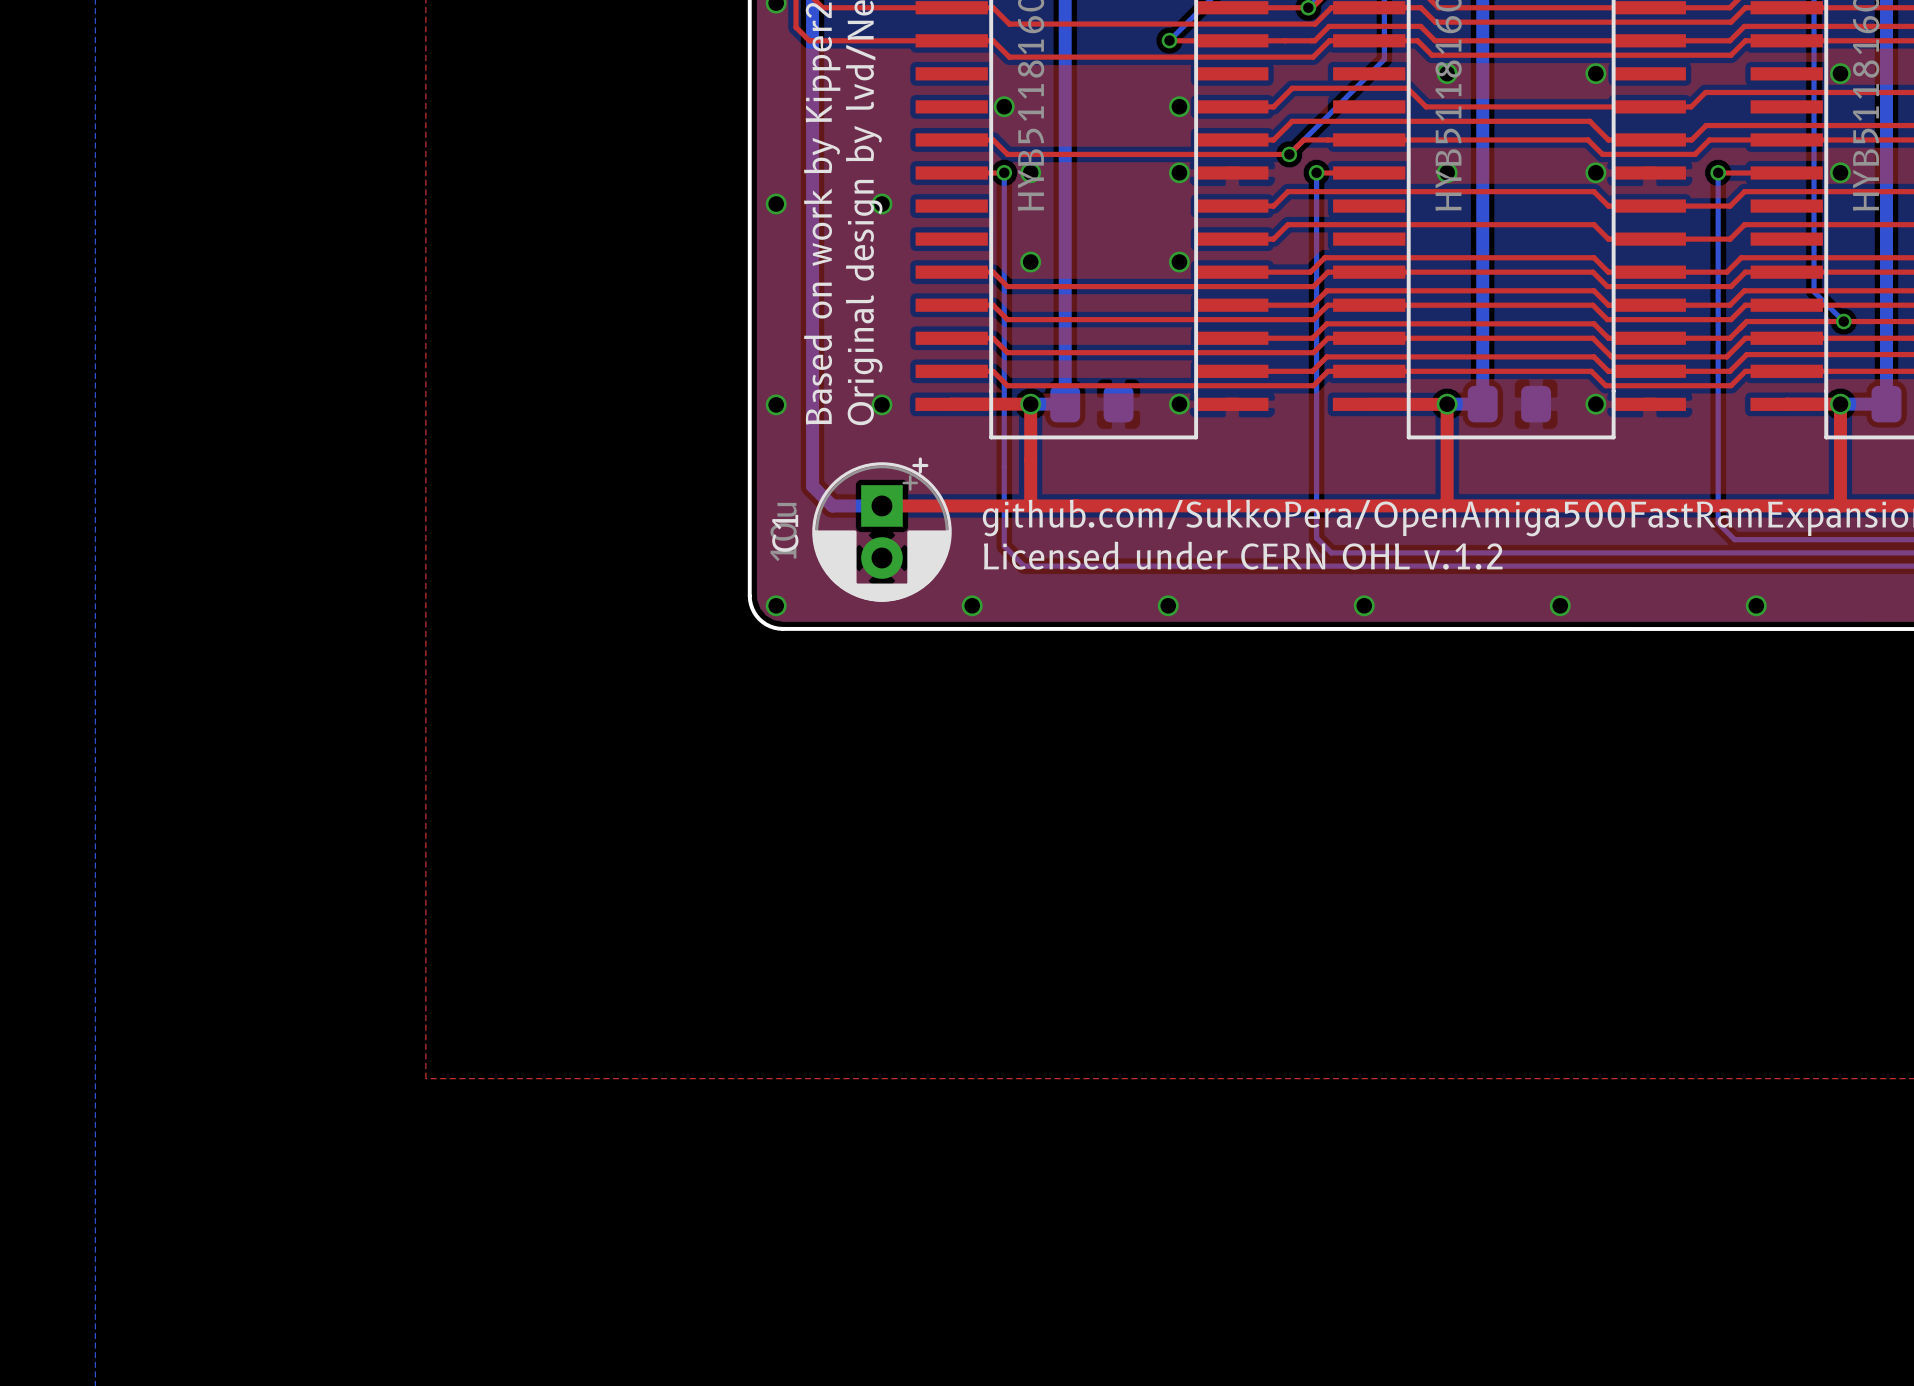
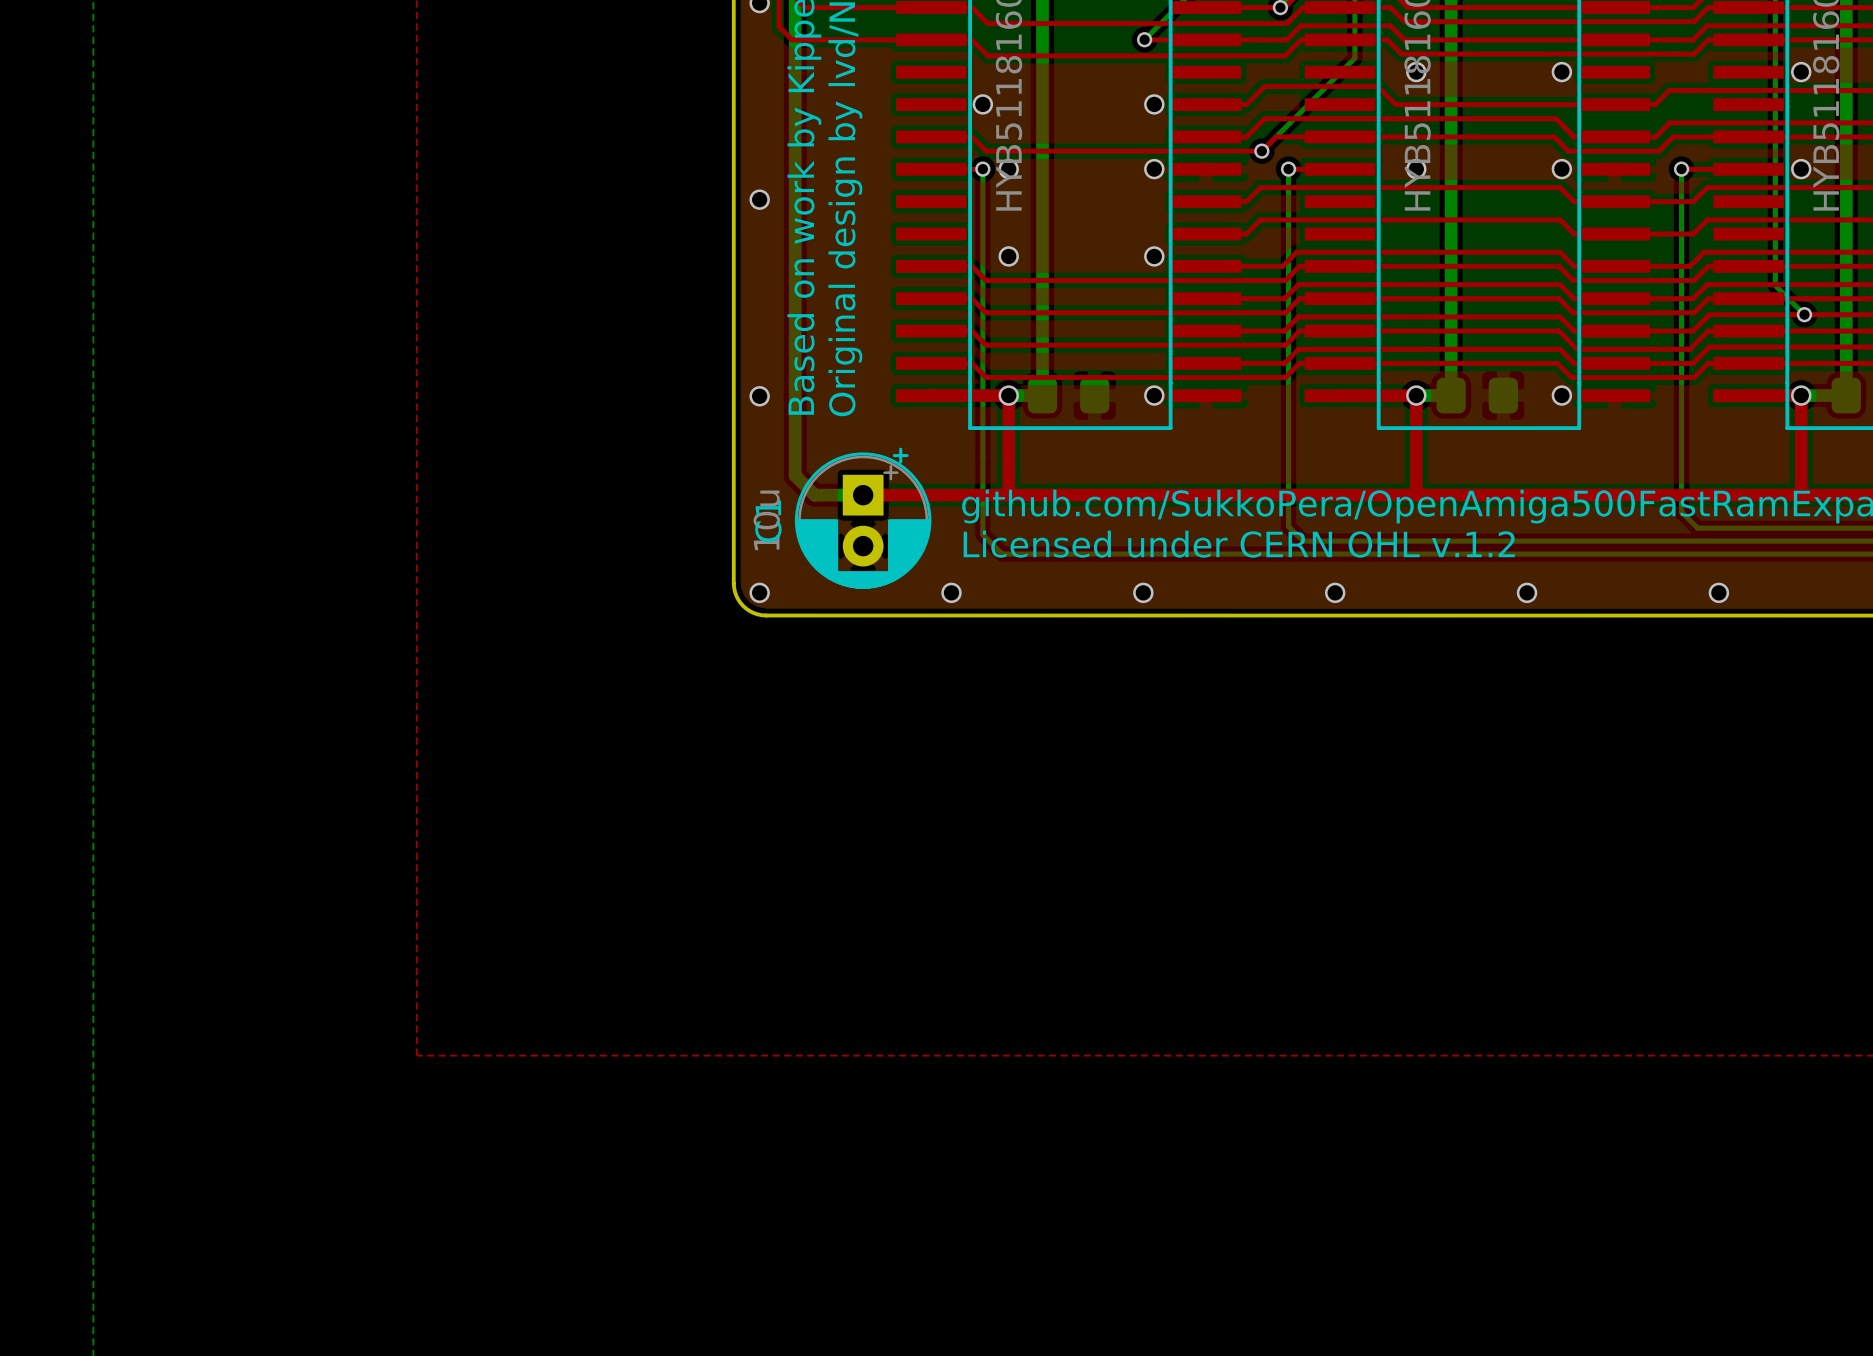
via: (881, 204) -> none
via: (881, 404) -> none

